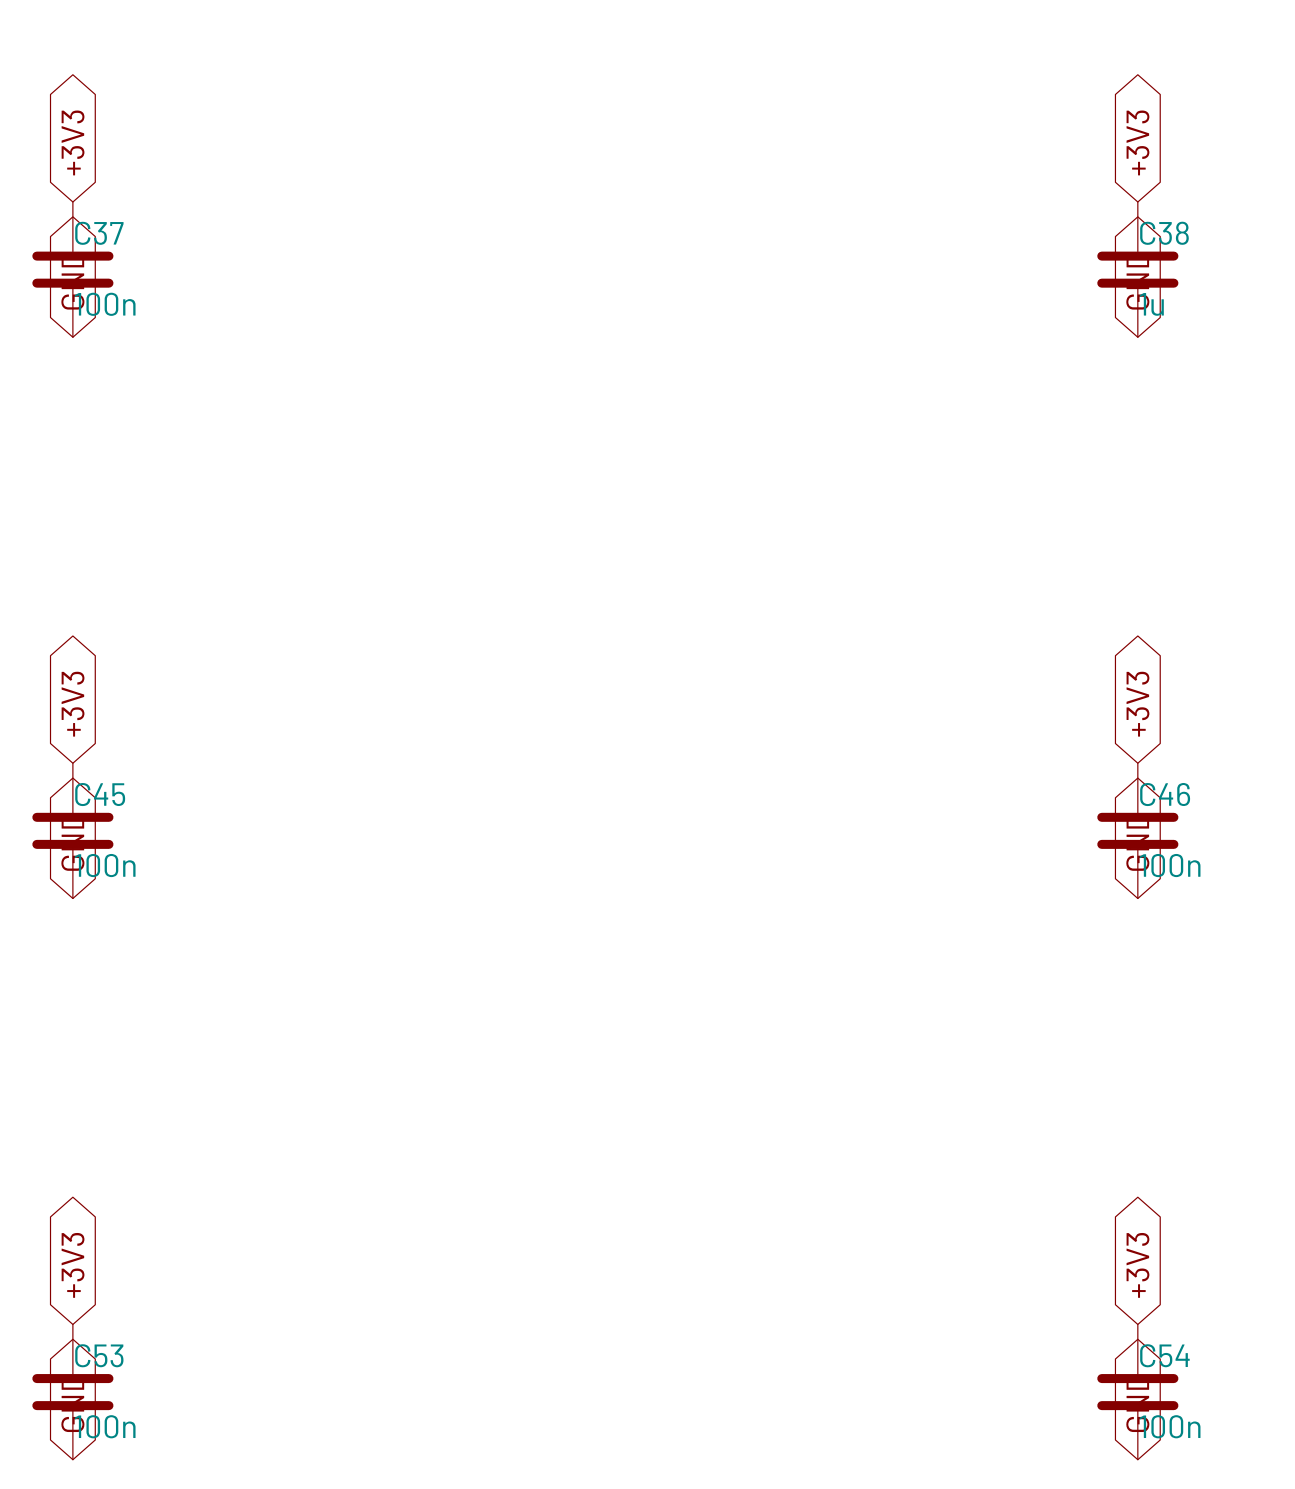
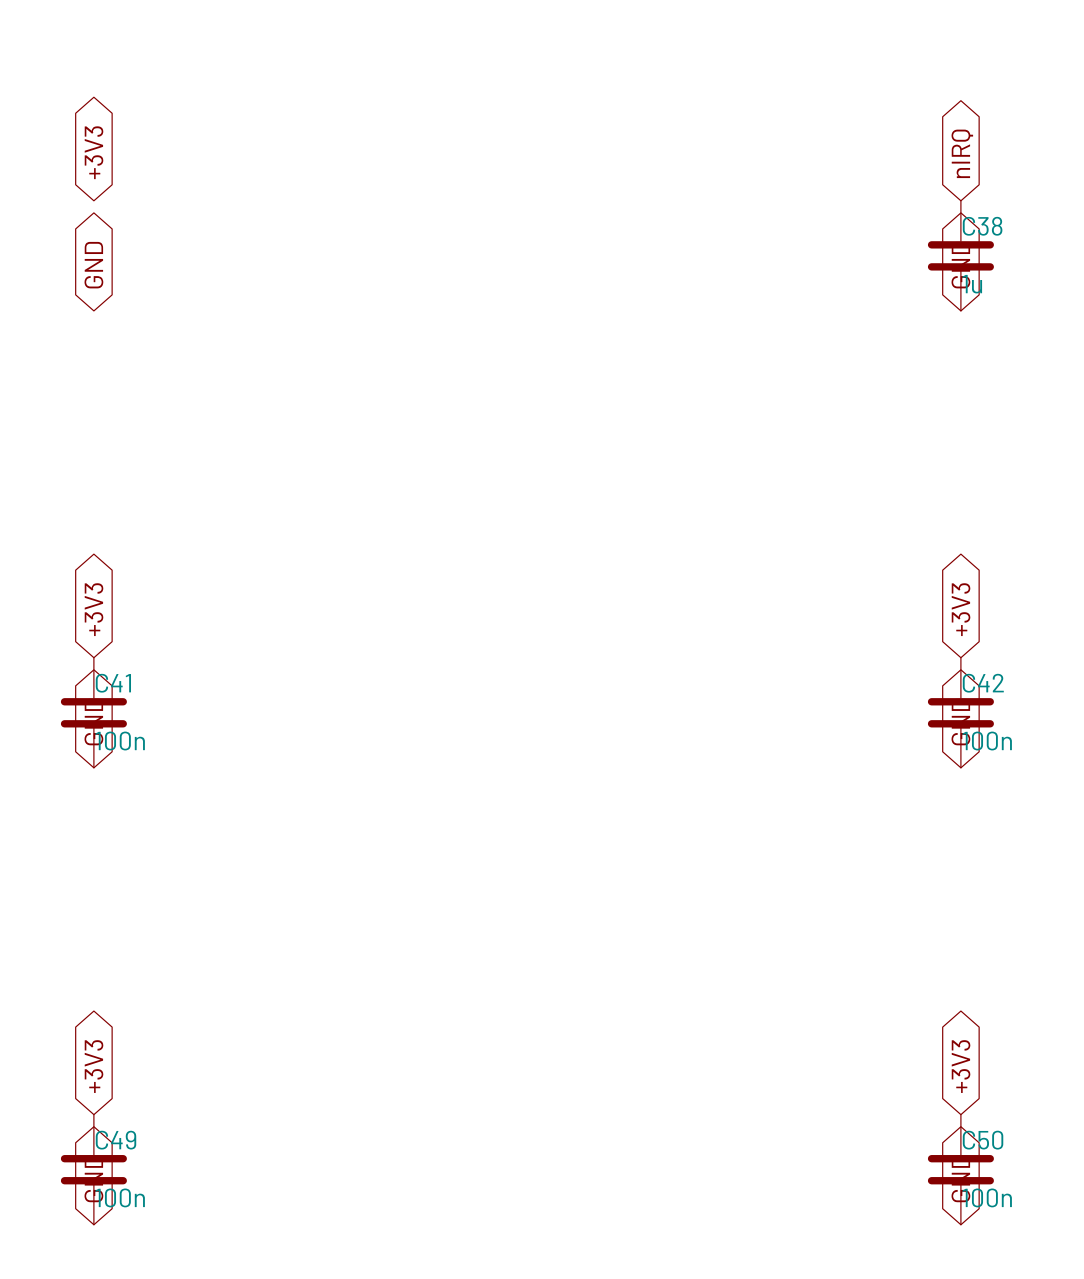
global label: +3V3 (1137, 142) -> nIRQ (962, 153)
C37: 100n (72, 269) -> none
C45 name: C45 (100, 794) -> C41 (113, 683)
C46 name: C46 (1165, 794) -> C42 (983, 683)
C53 name: C53 (99, 1355) -> C49 (116, 1140)
C54 name: C54 (1164, 1355) -> C50 (983, 1140)

